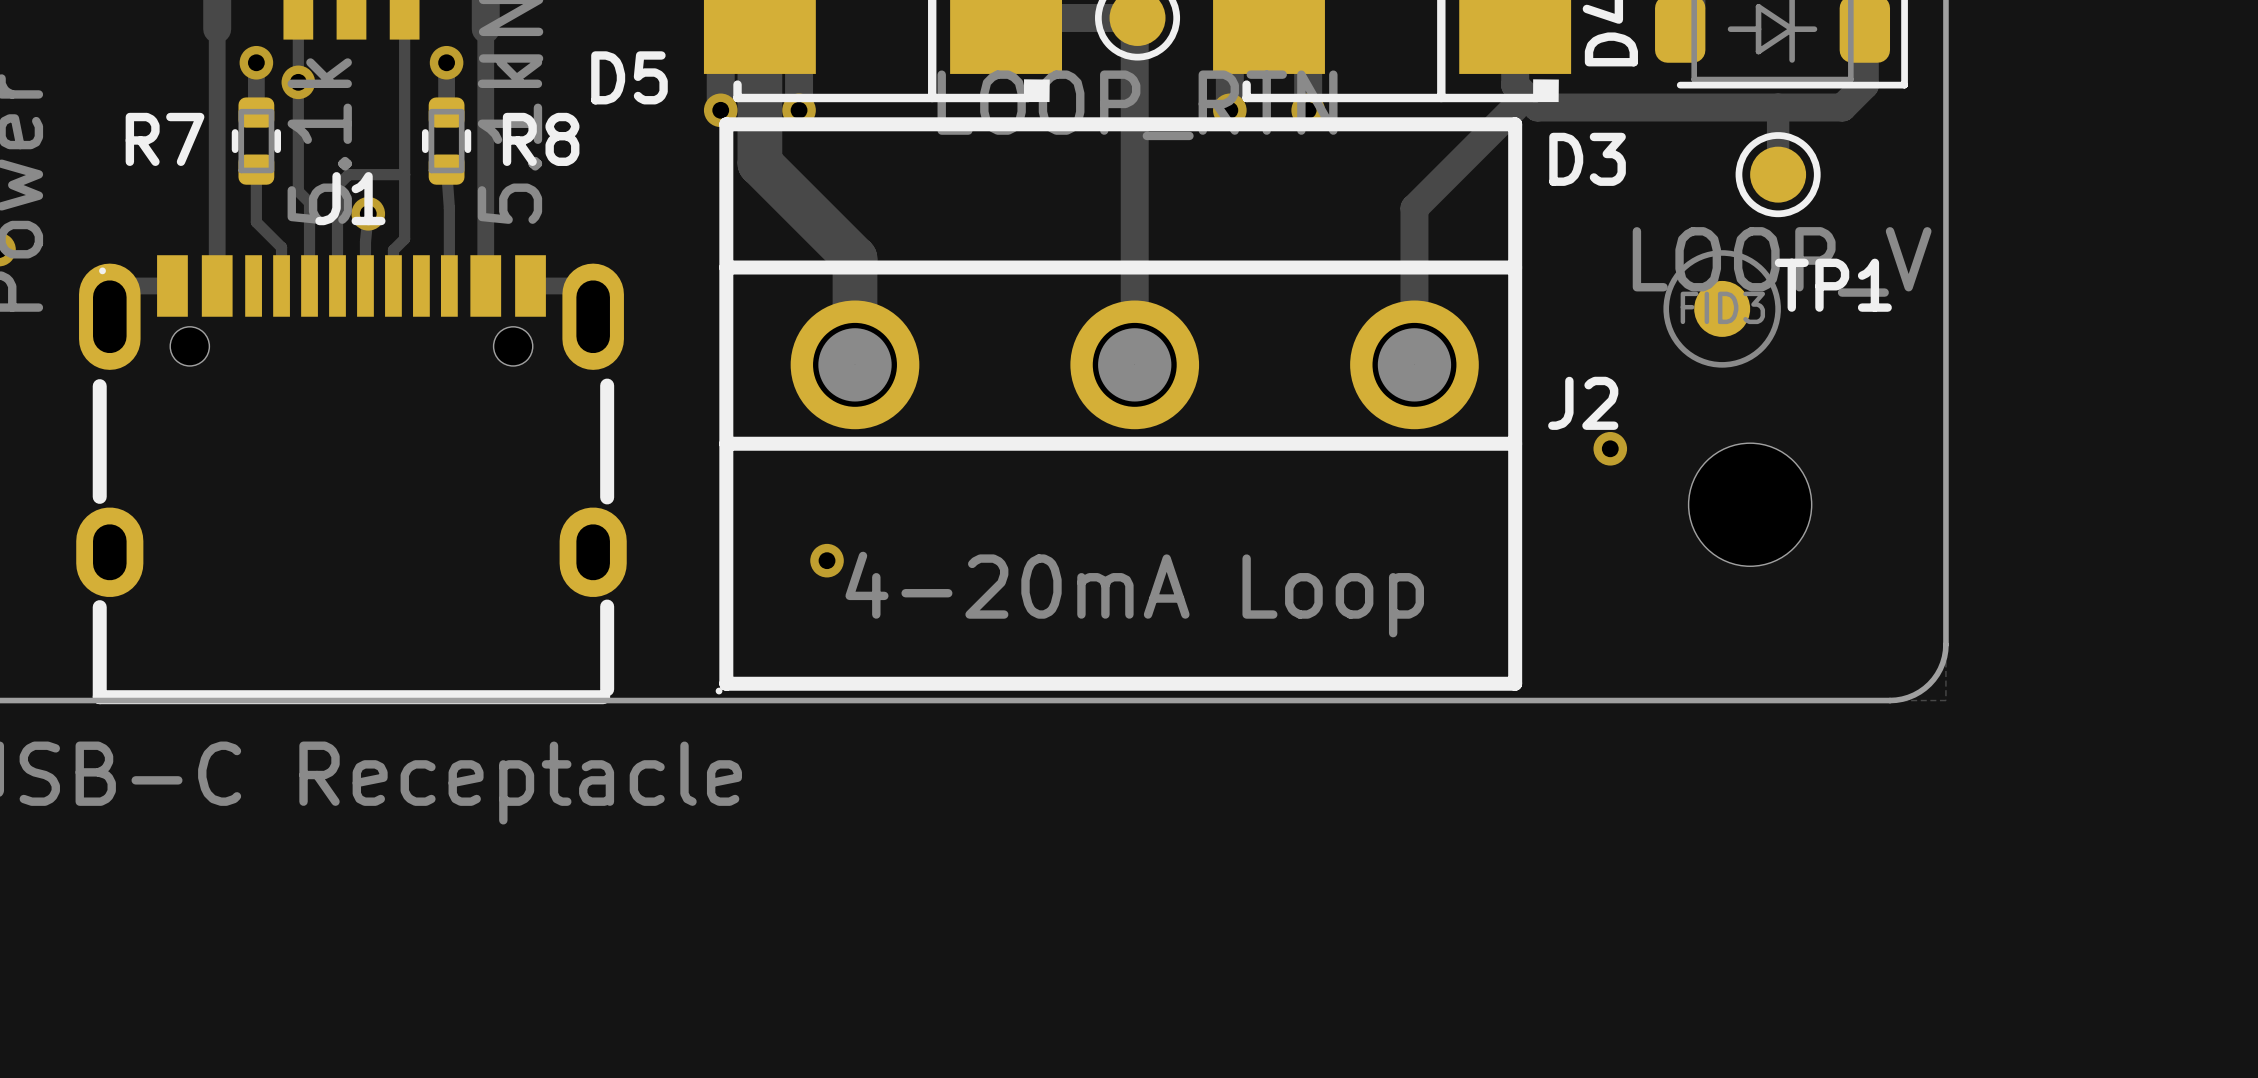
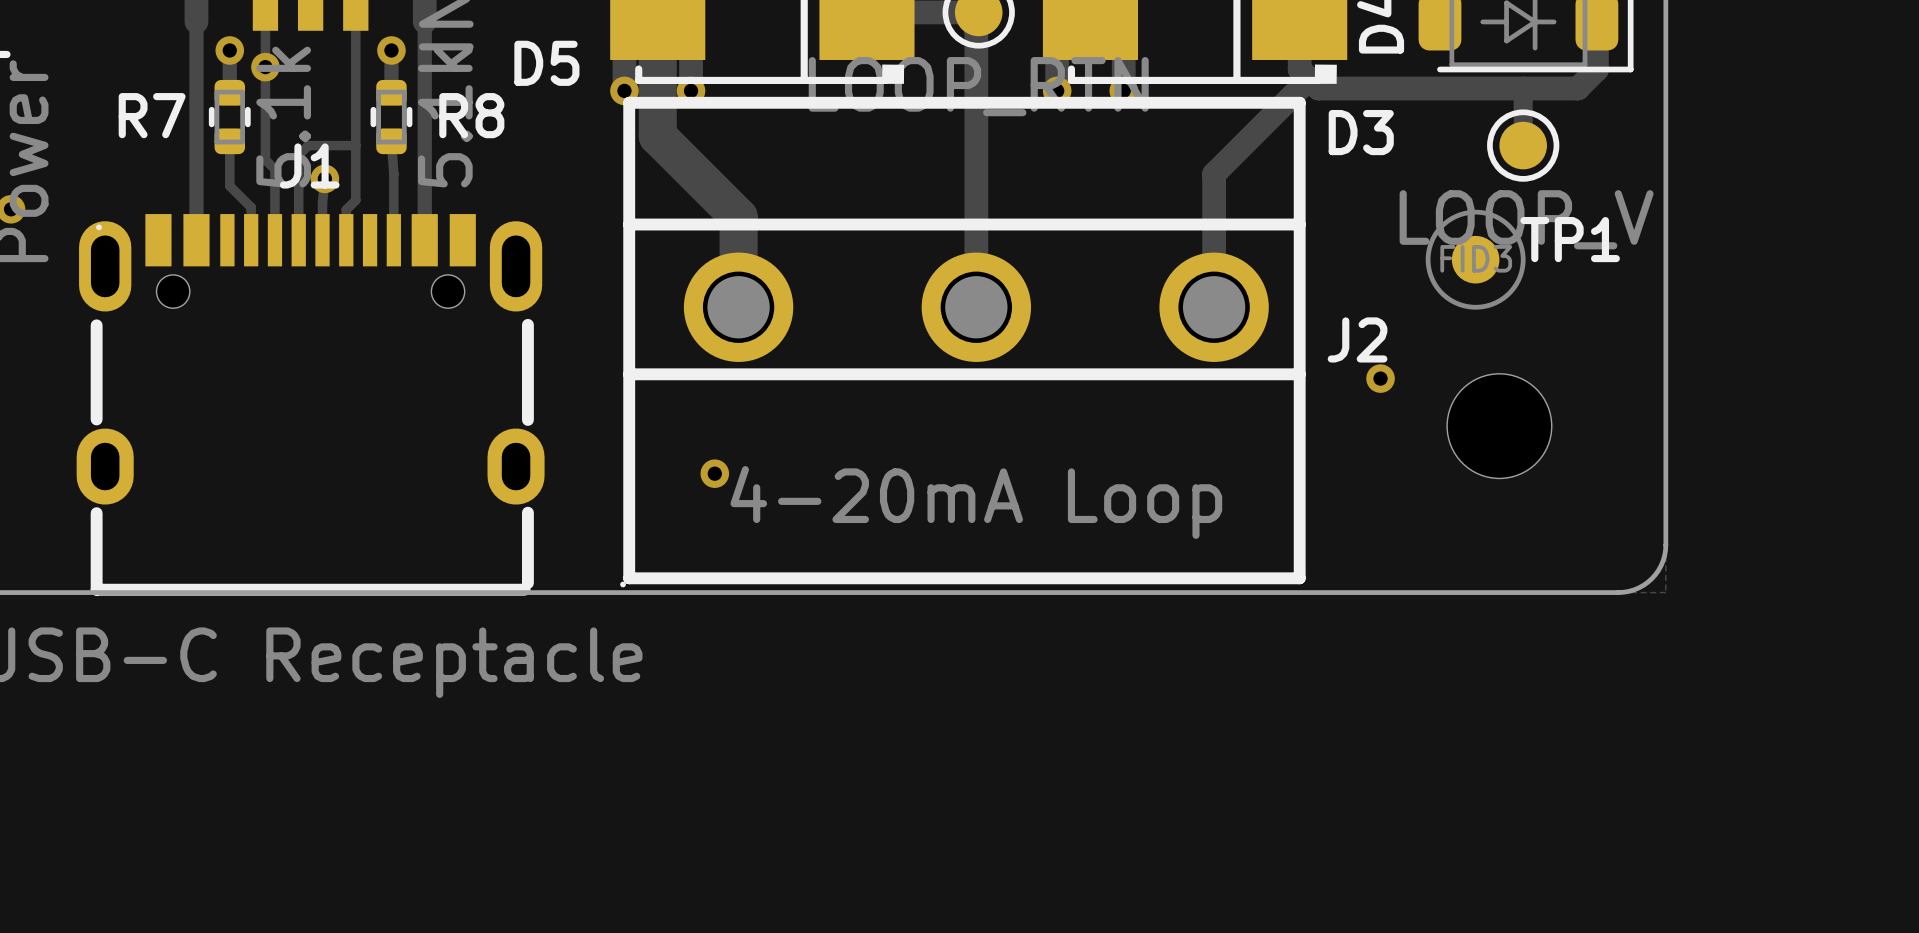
track: (124, 285) (172, 285) -> none
track: (530, 285) (578, 285) -> none

